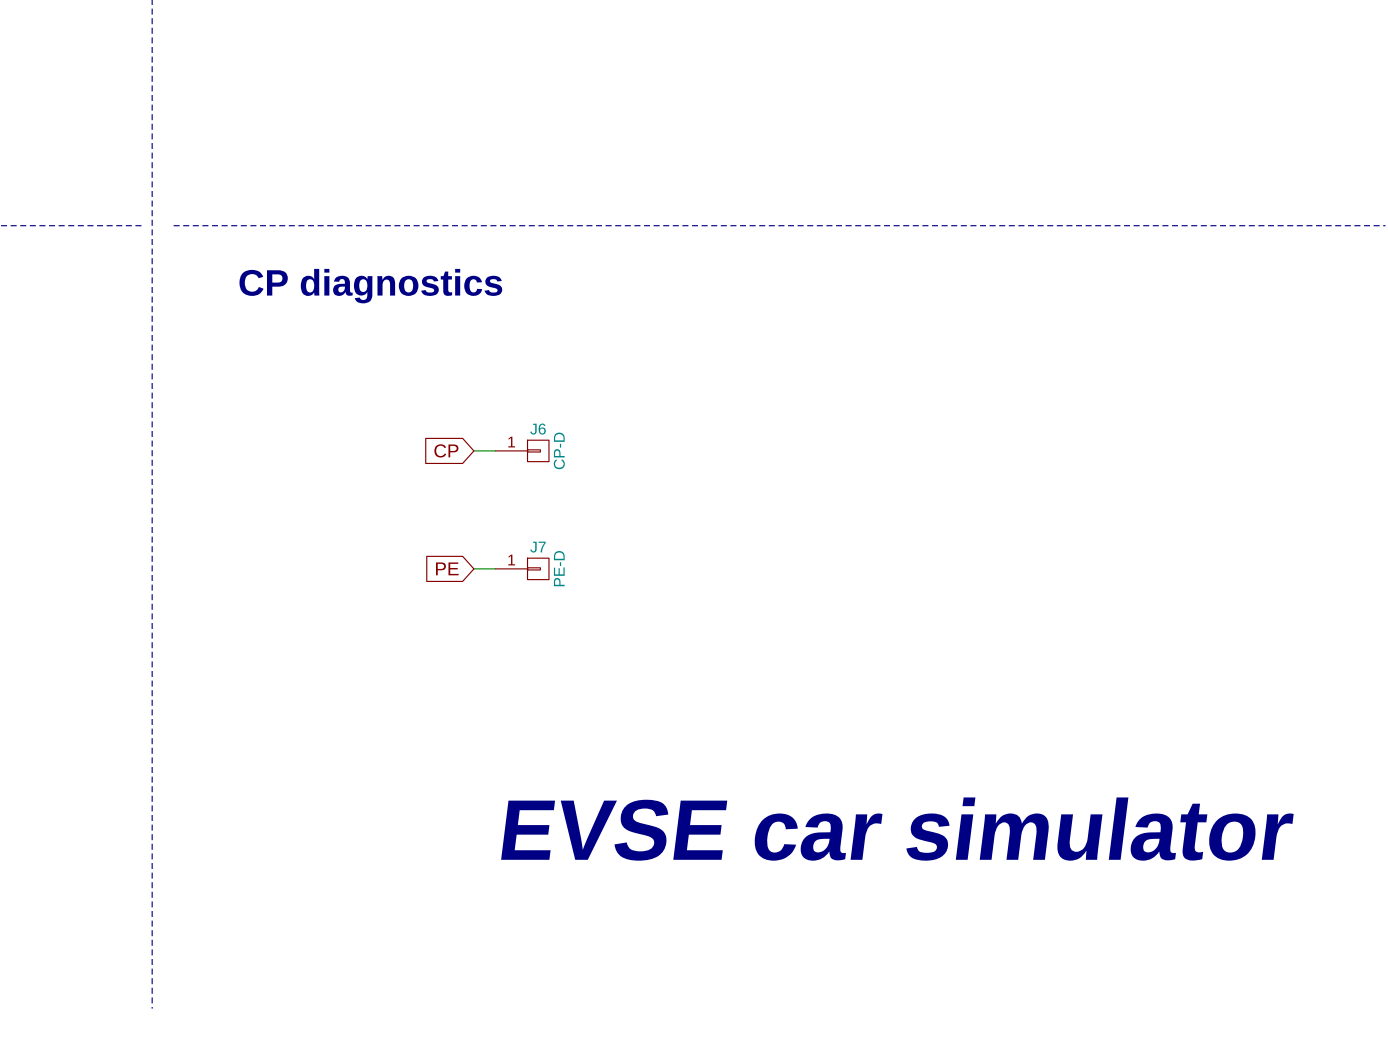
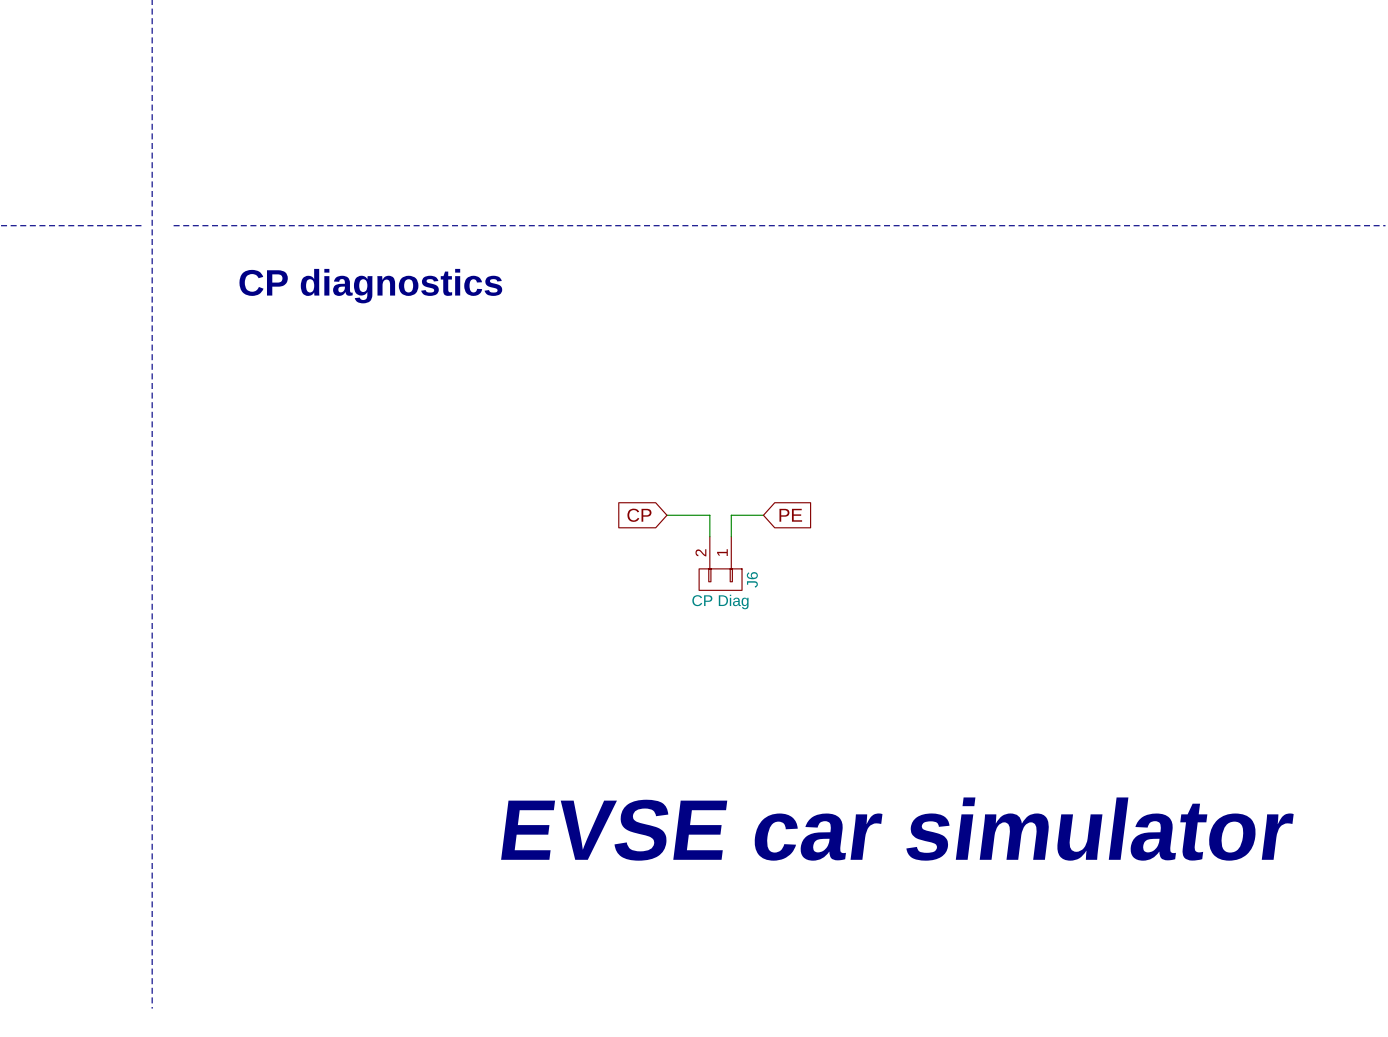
J6 name position: J6 (538, 429) -> J6 (752, 579)
J6 symbol: [495, 440, 549, 462] -> [699, 536, 743, 591]
global label position: CP (446, 450) -> CP (639, 515)
wire: (473, 450) (495, 450) -> none
J6 value: CP-D (559, 450) -> CP Diag (720, 601)
wire: none -> (666, 515) (709, 515) (709, 536)
wire: none -> (763, 515) (731, 515) (731, 536)
global label: none -> PE (790, 515)
global label: PE (447, 568) -> none
wire: (473, 568) (495, 568) -> none
J7: PE-D (522, 568) -> none

